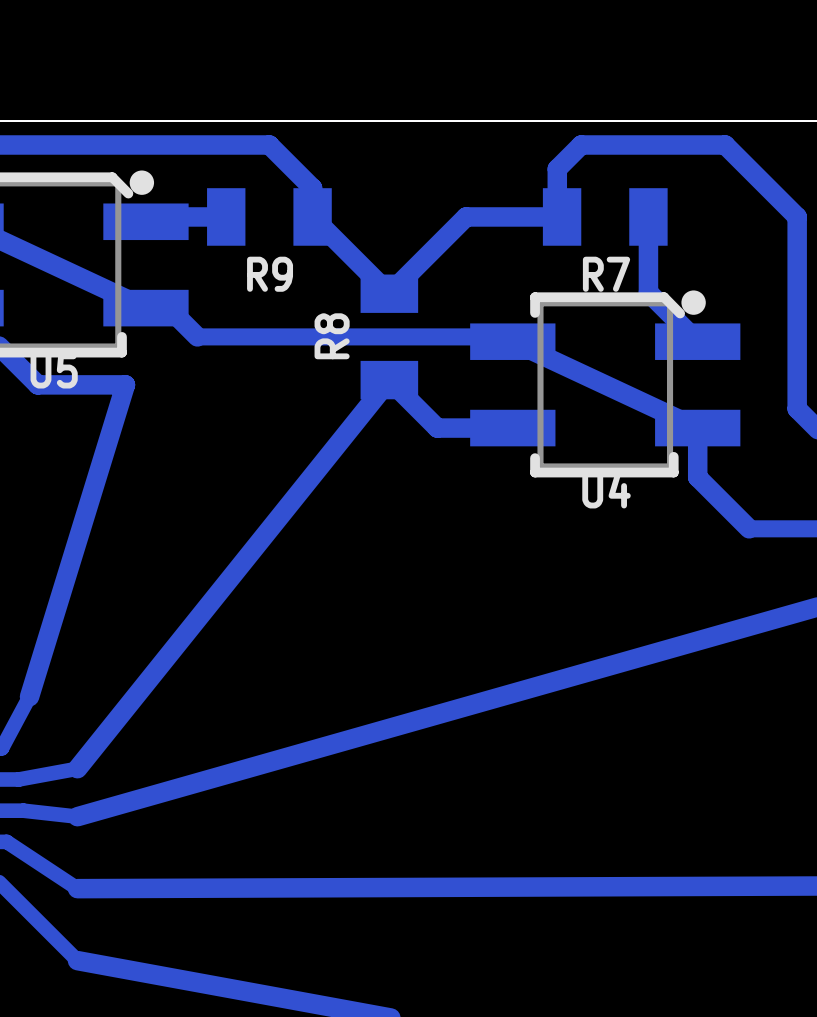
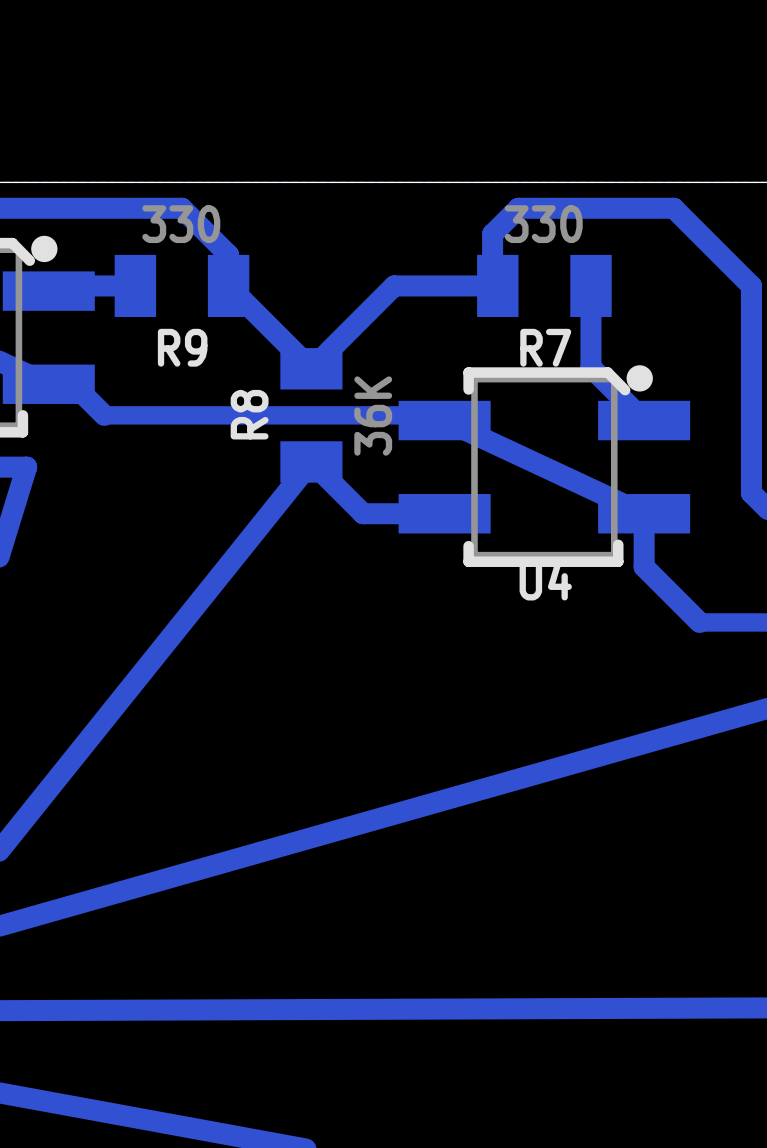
R9 value: none -> 330 (181, 224)
R7 value: none -> 330 (543, 224)
R8 value: none -> 36K (373, 416)

